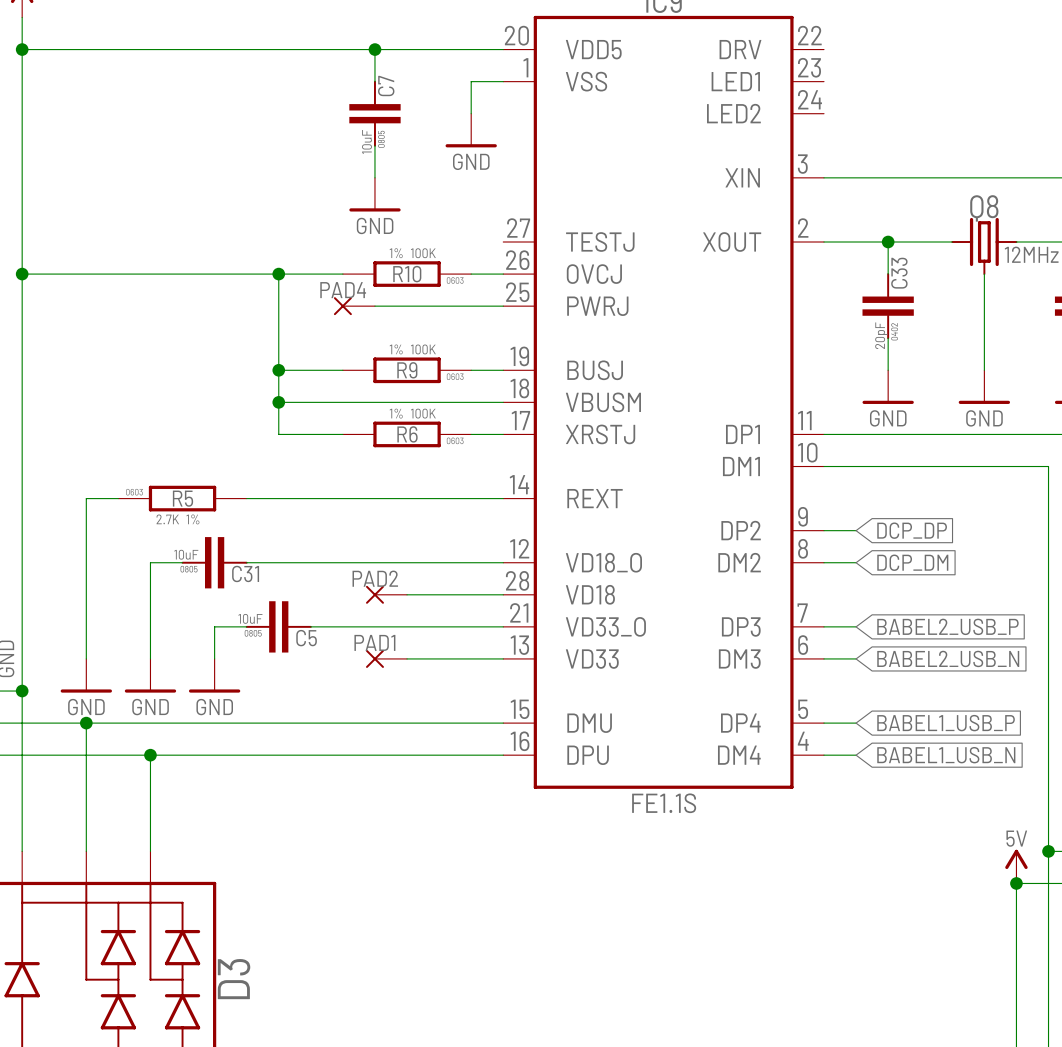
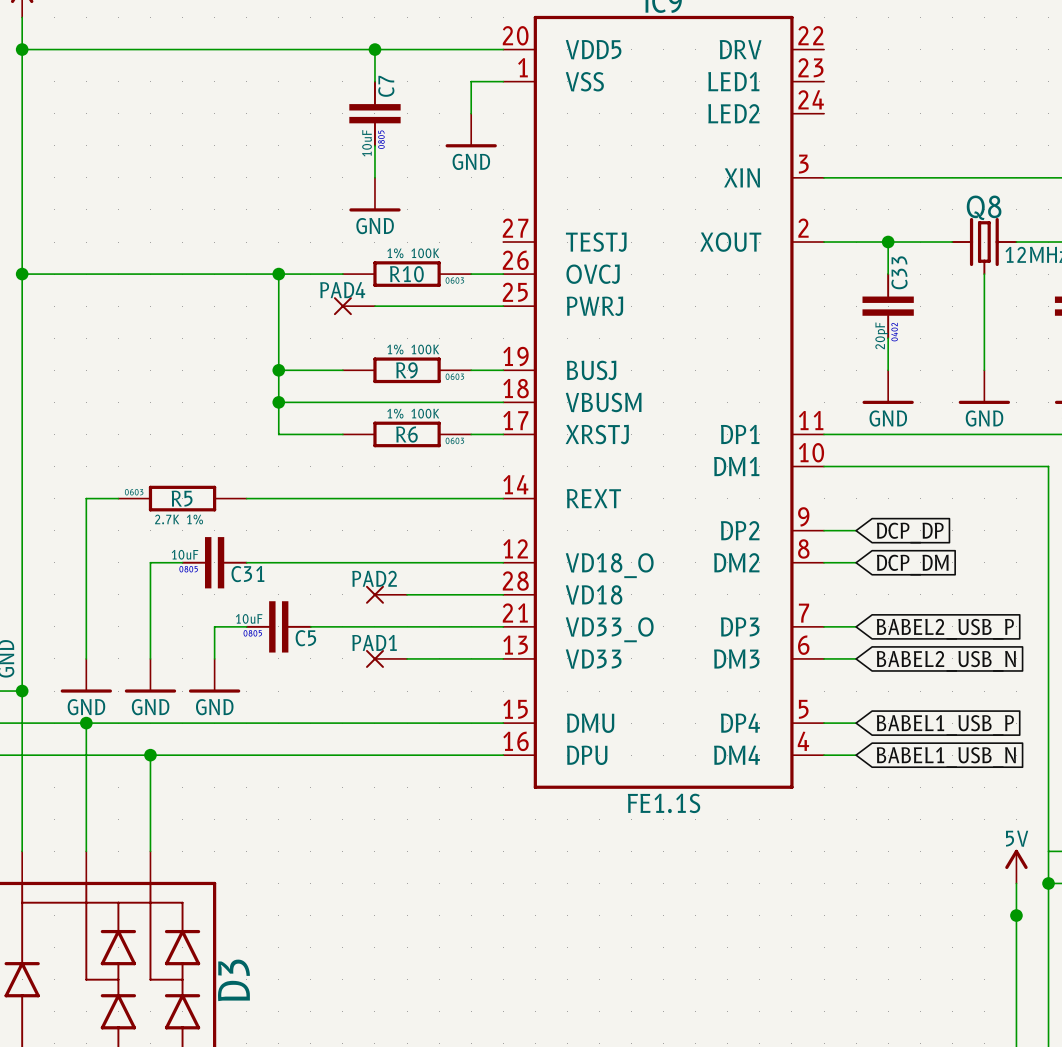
junction: (1048, 851) -> none
wire: (1016, 883) (1048, 883) -> none
junction: (1016, 883) -> none
junction: none -> (1048, 883)
junction: none -> (1016, 915)

